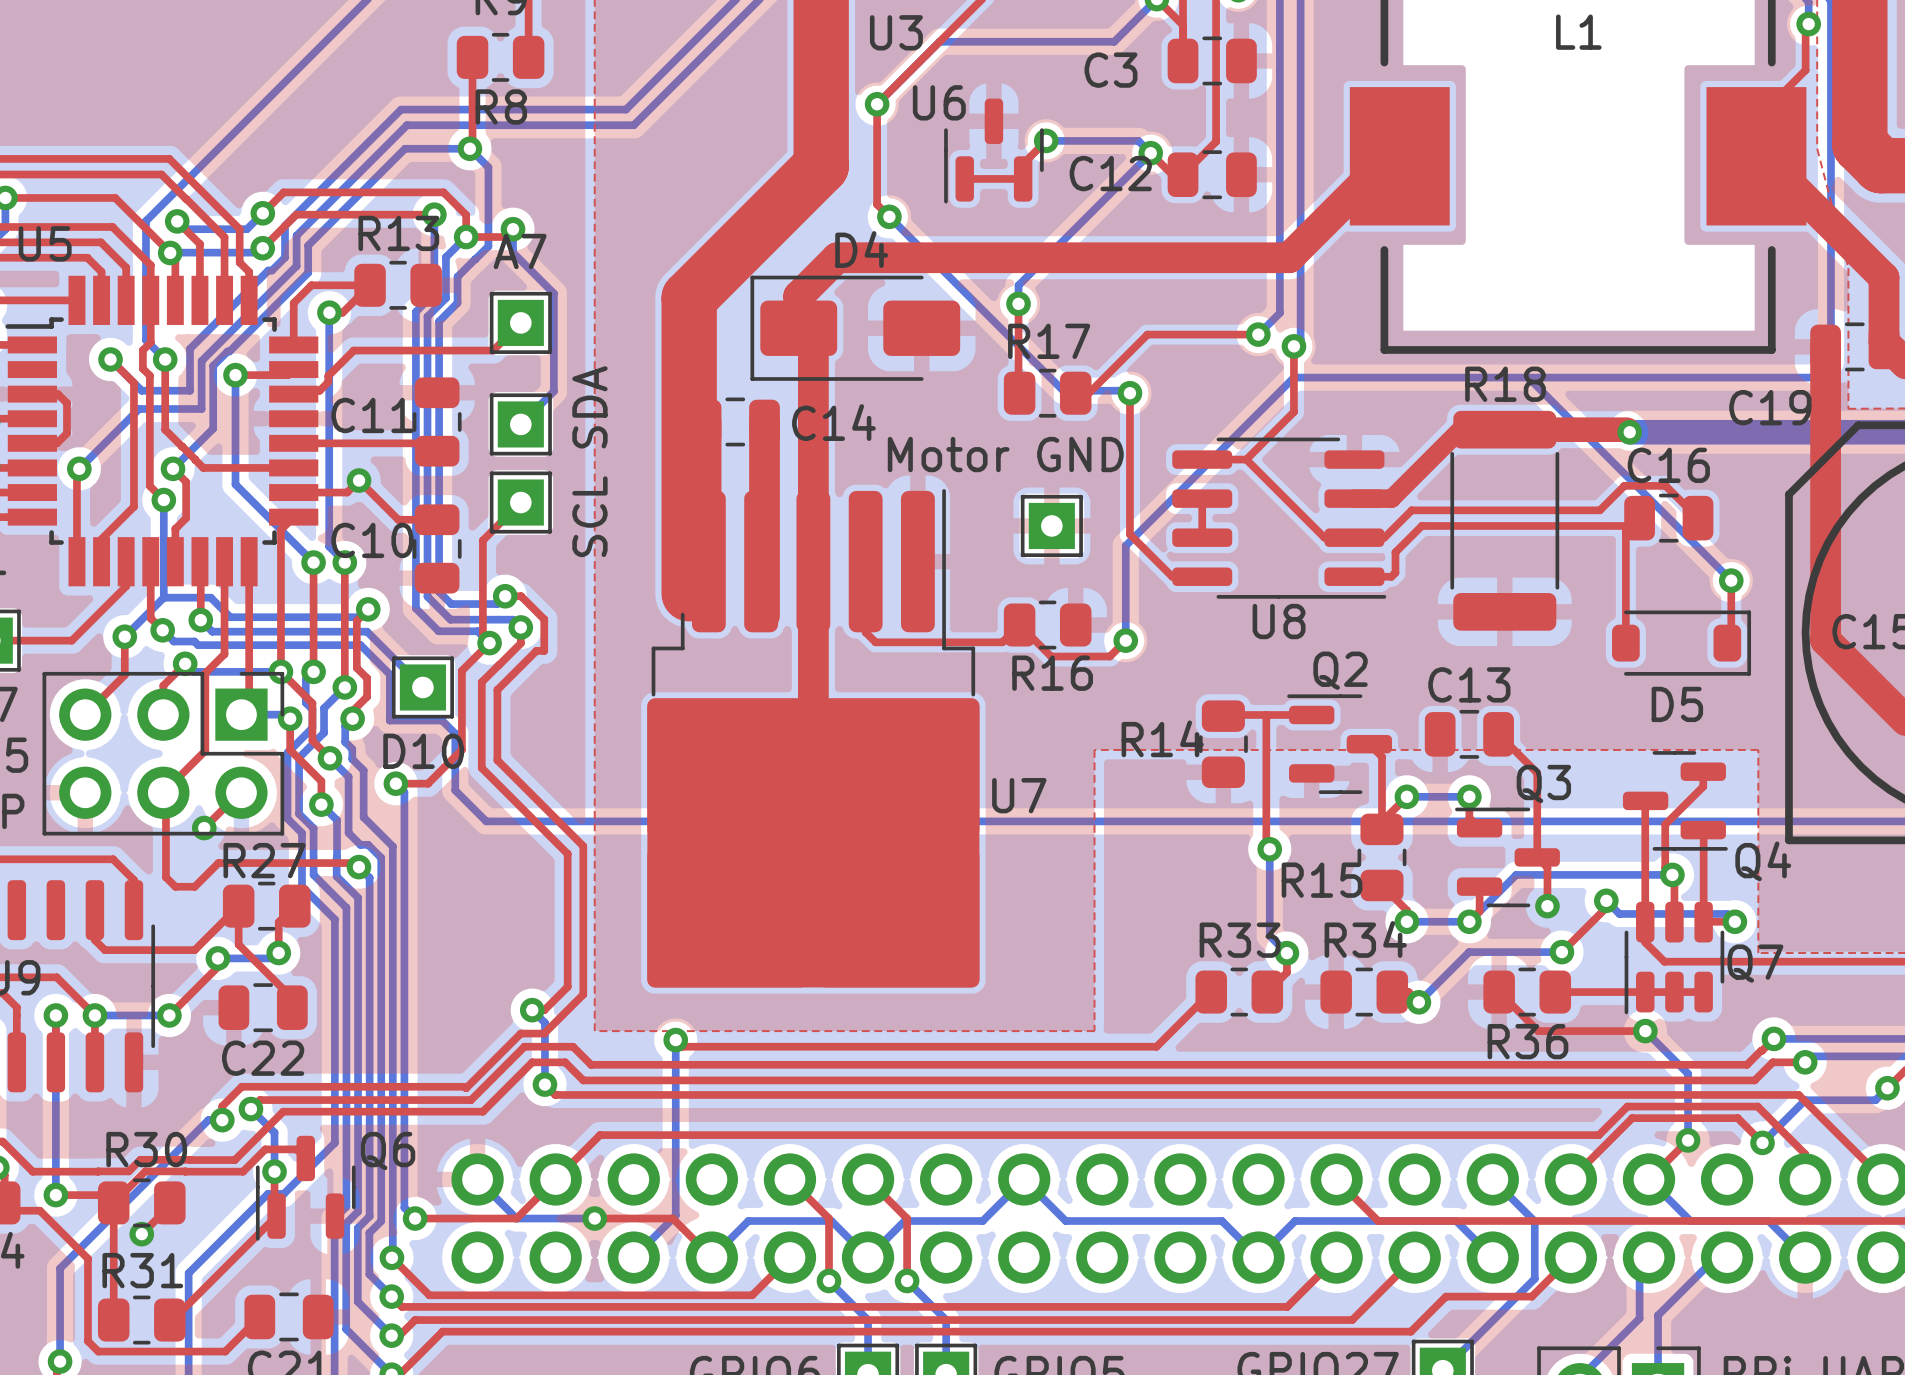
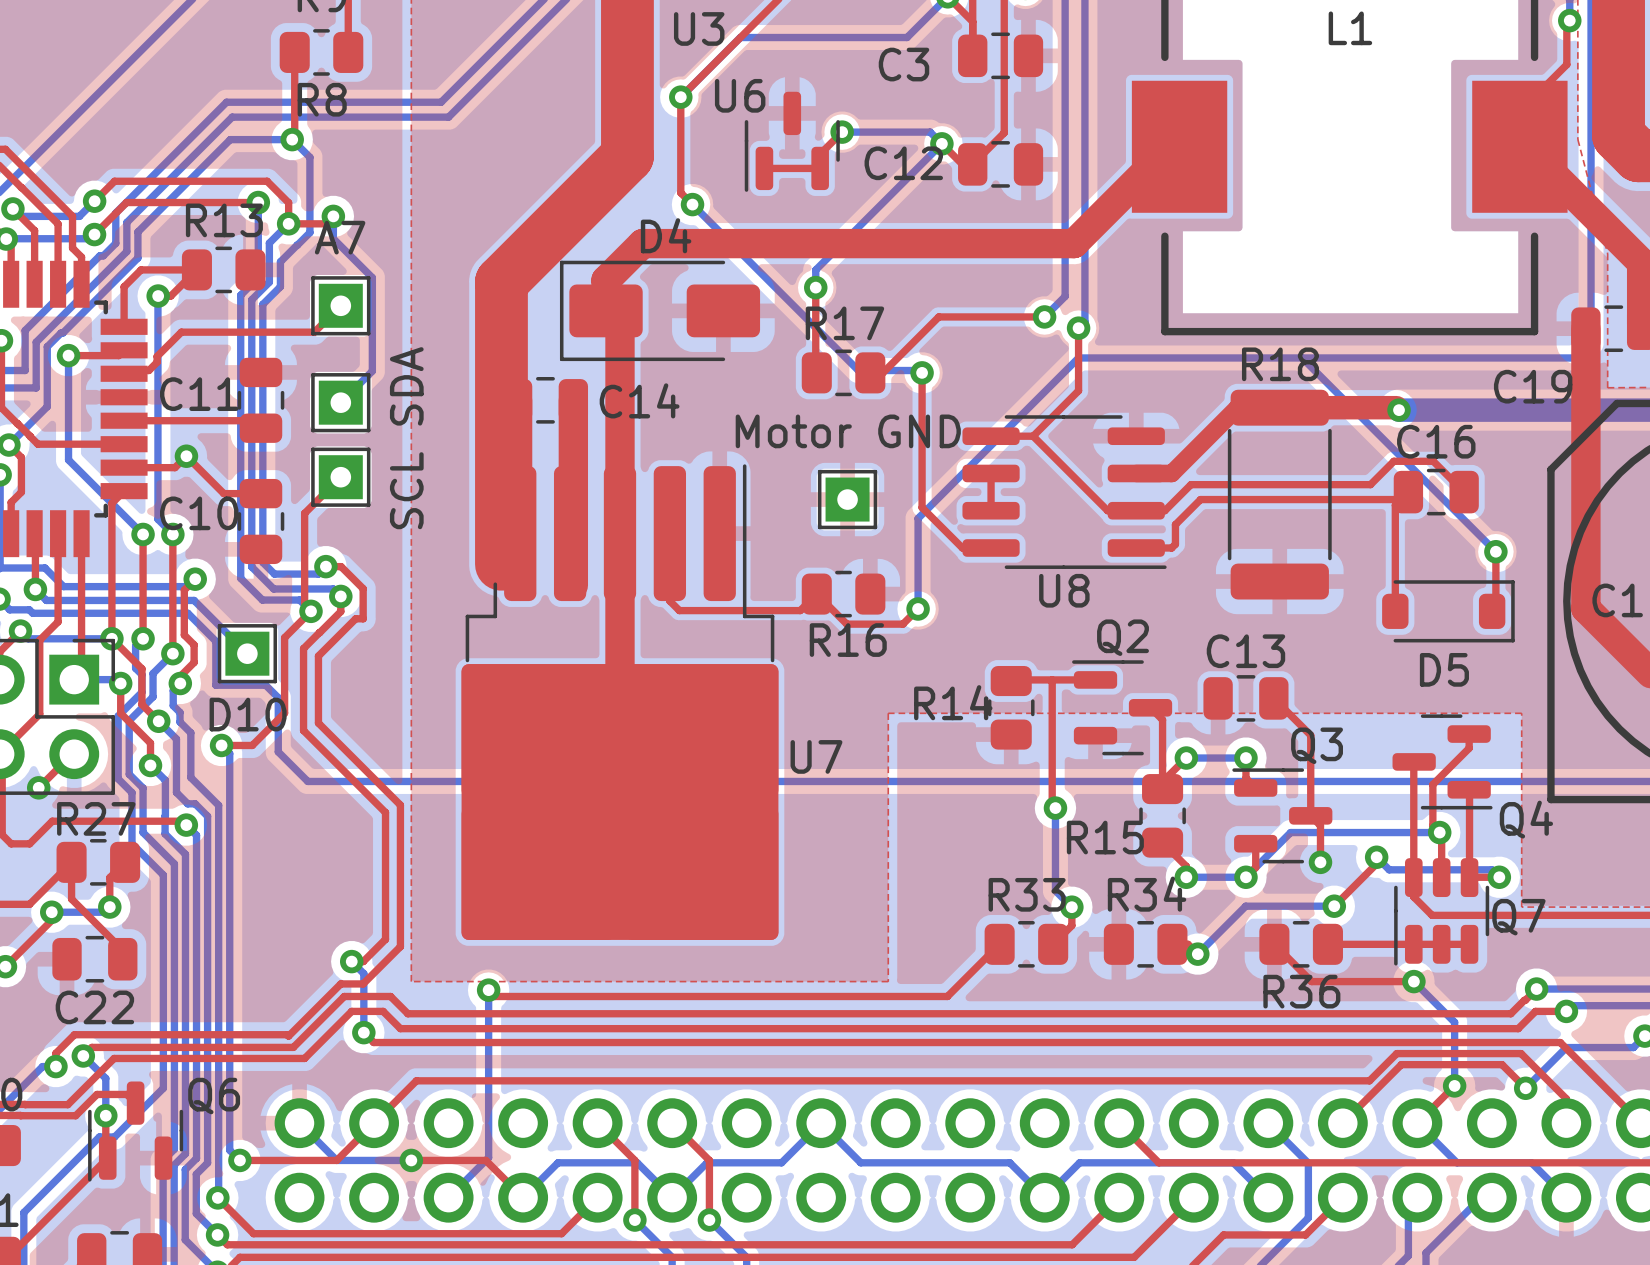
part text position: Motor GND (1005, 454) -> Motor GND (848, 431)

